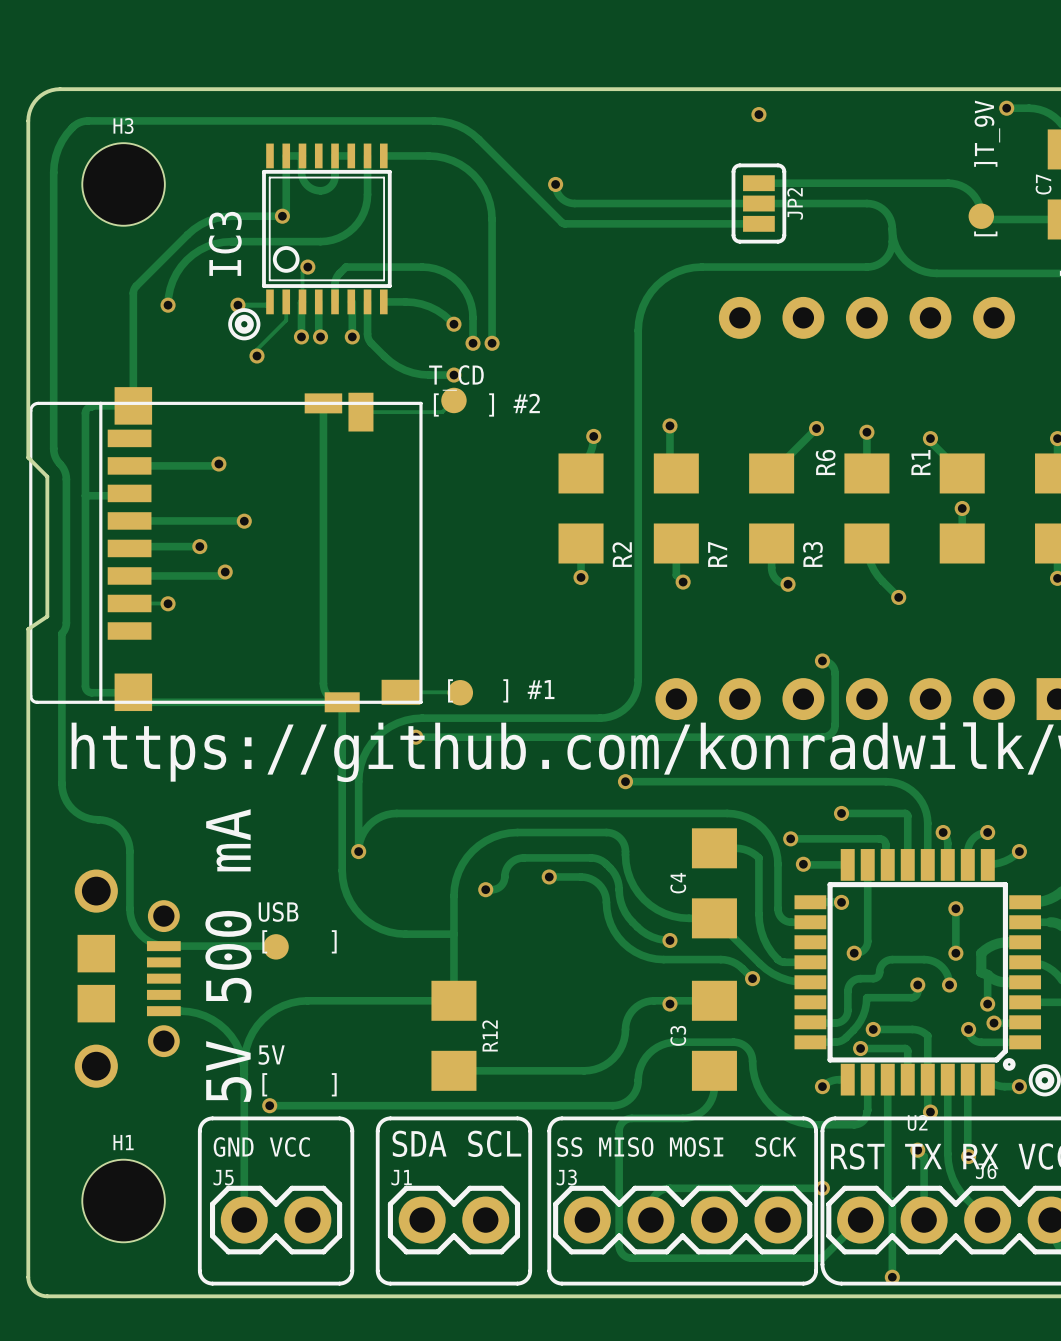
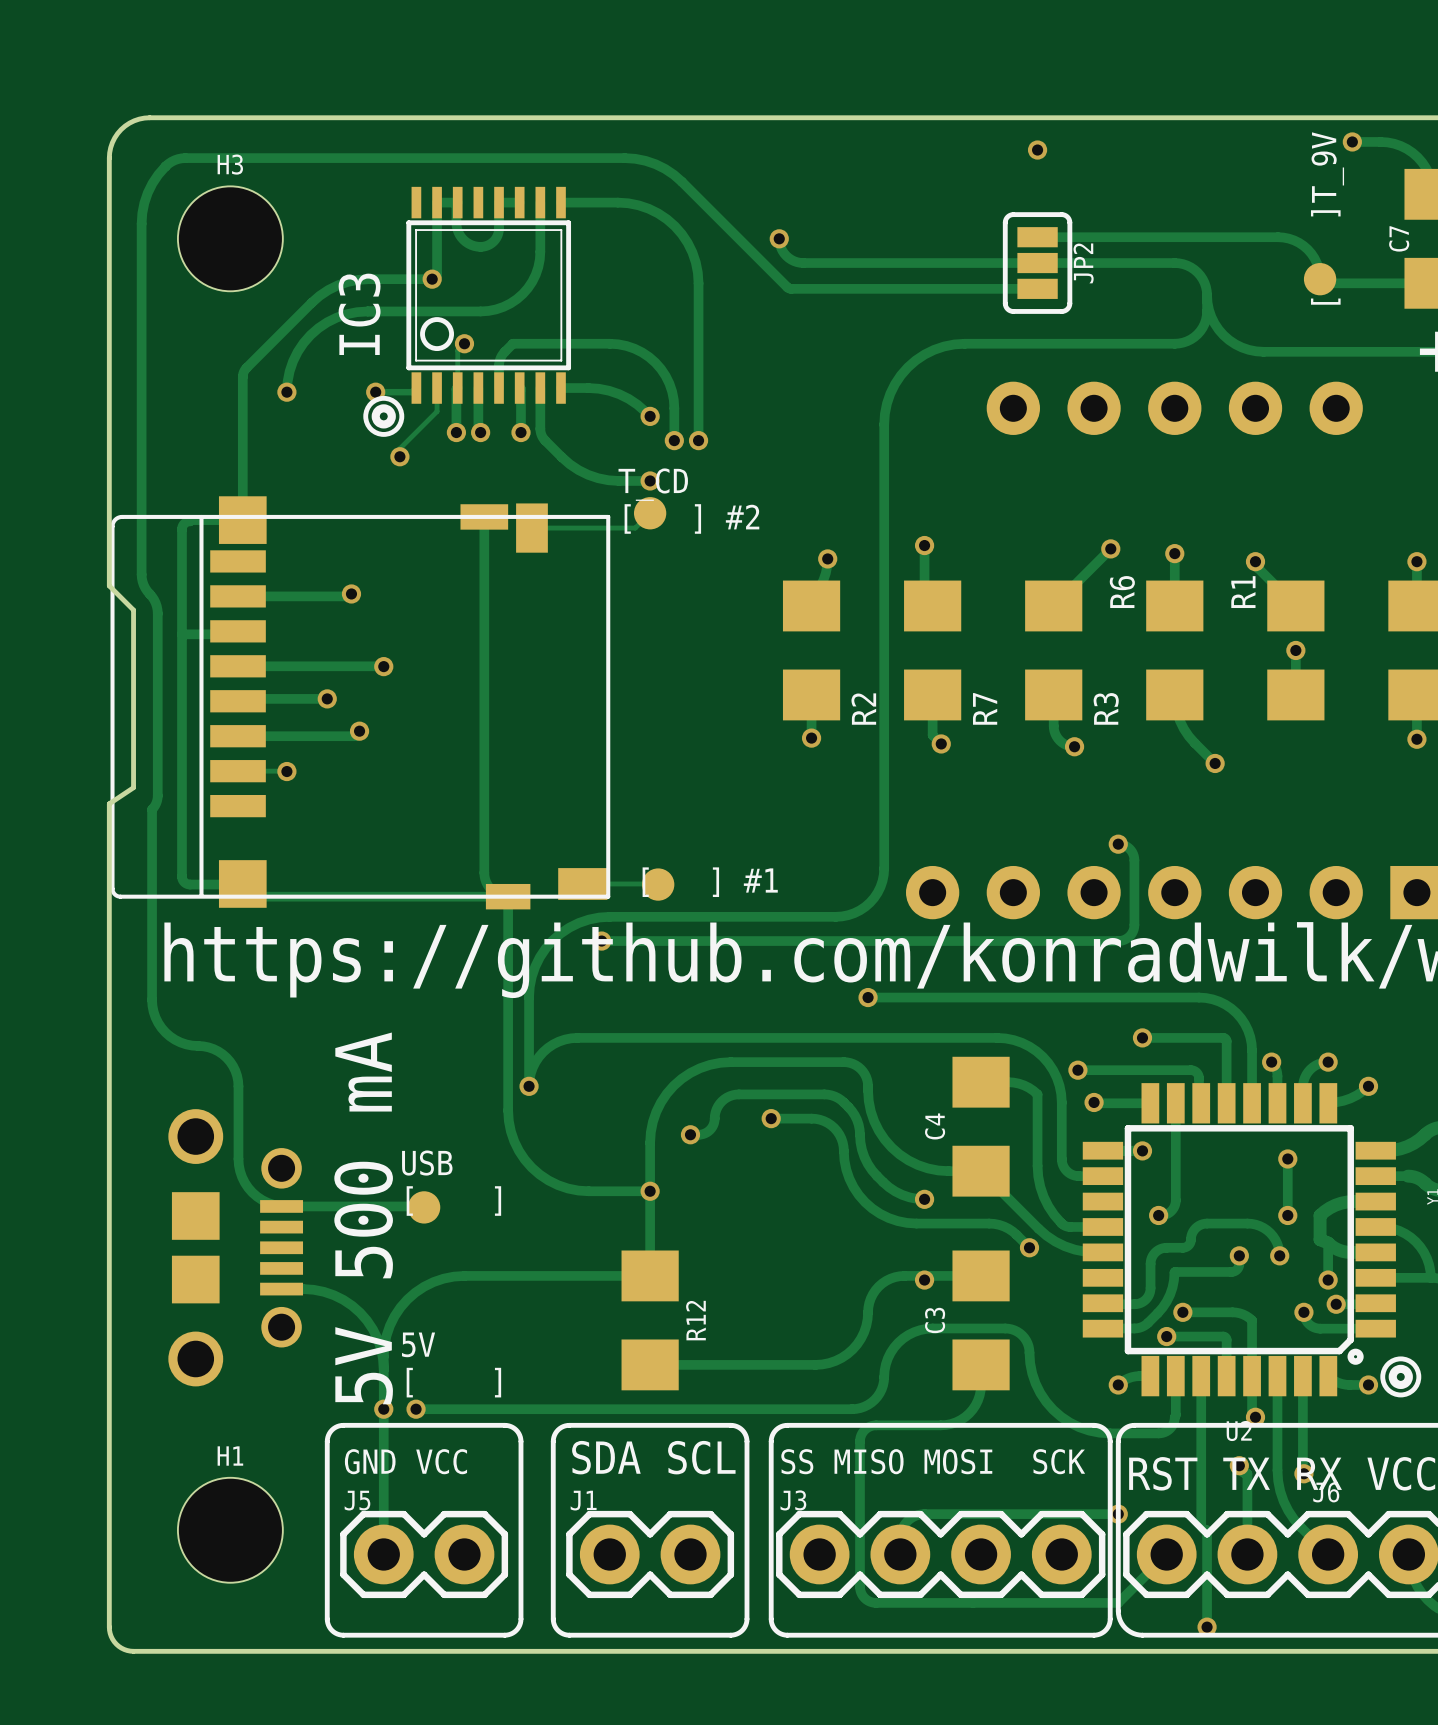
via: none -> (650, 1191)
via: none -> (383, 1409)

